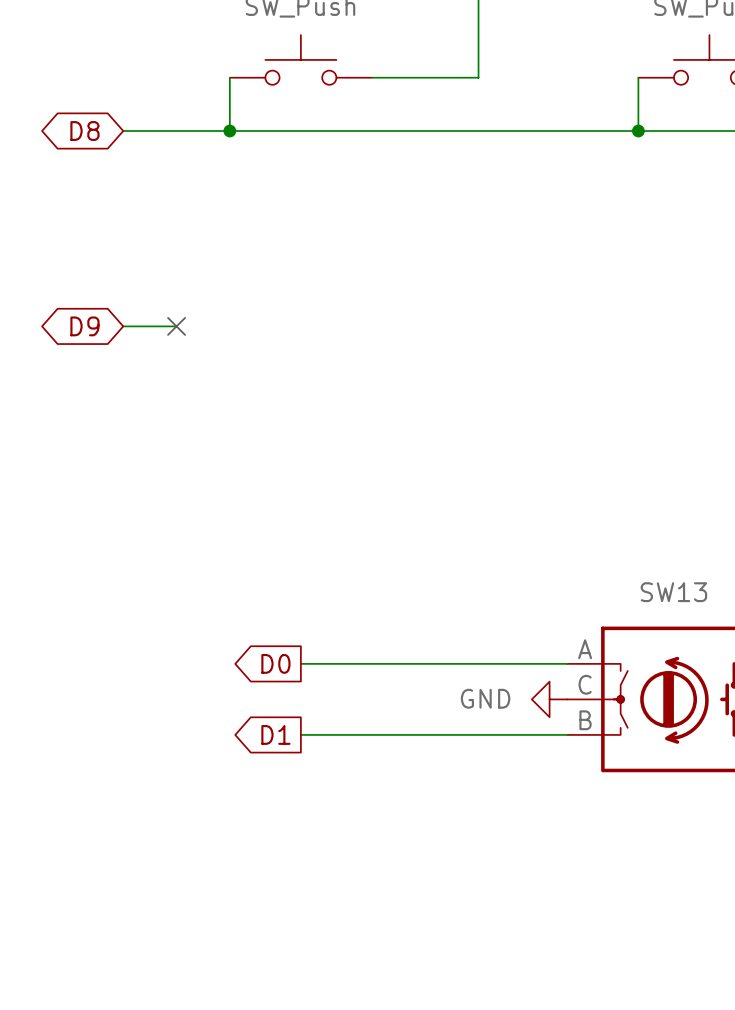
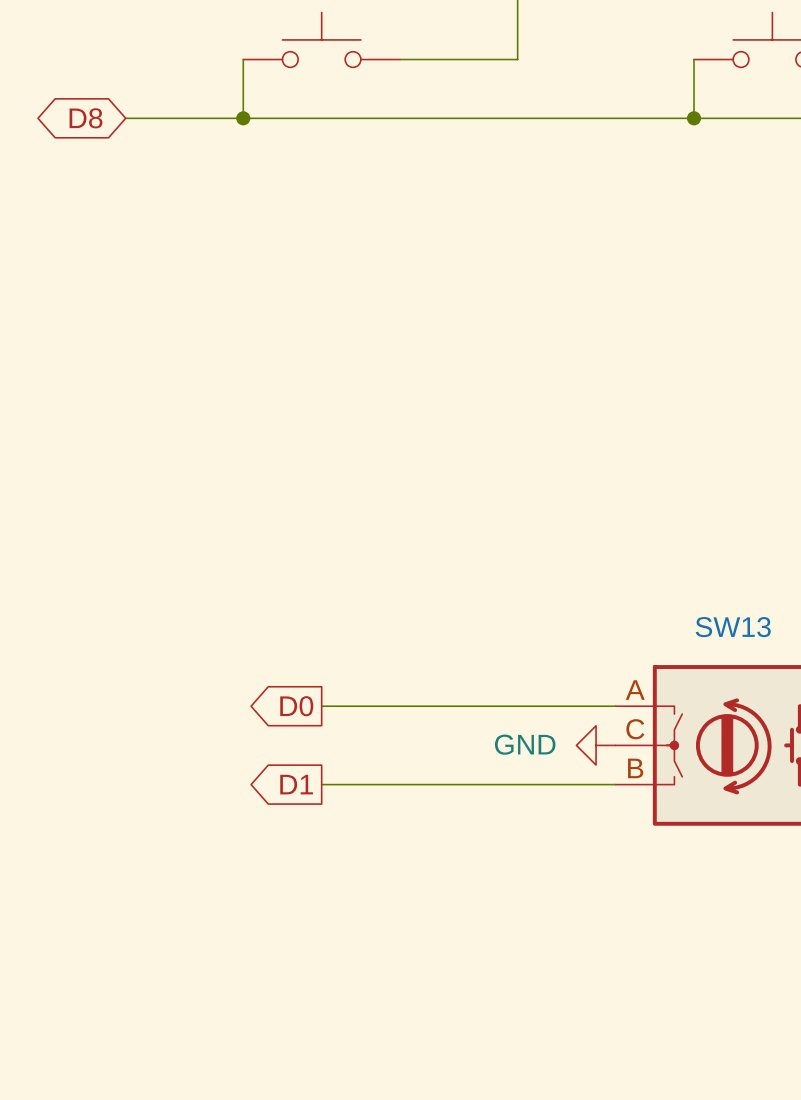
global label: D9 (84, 326) -> none
wire: (123, 326) (176, 326) -> none
no-connect mark: (176, 326) -> none

